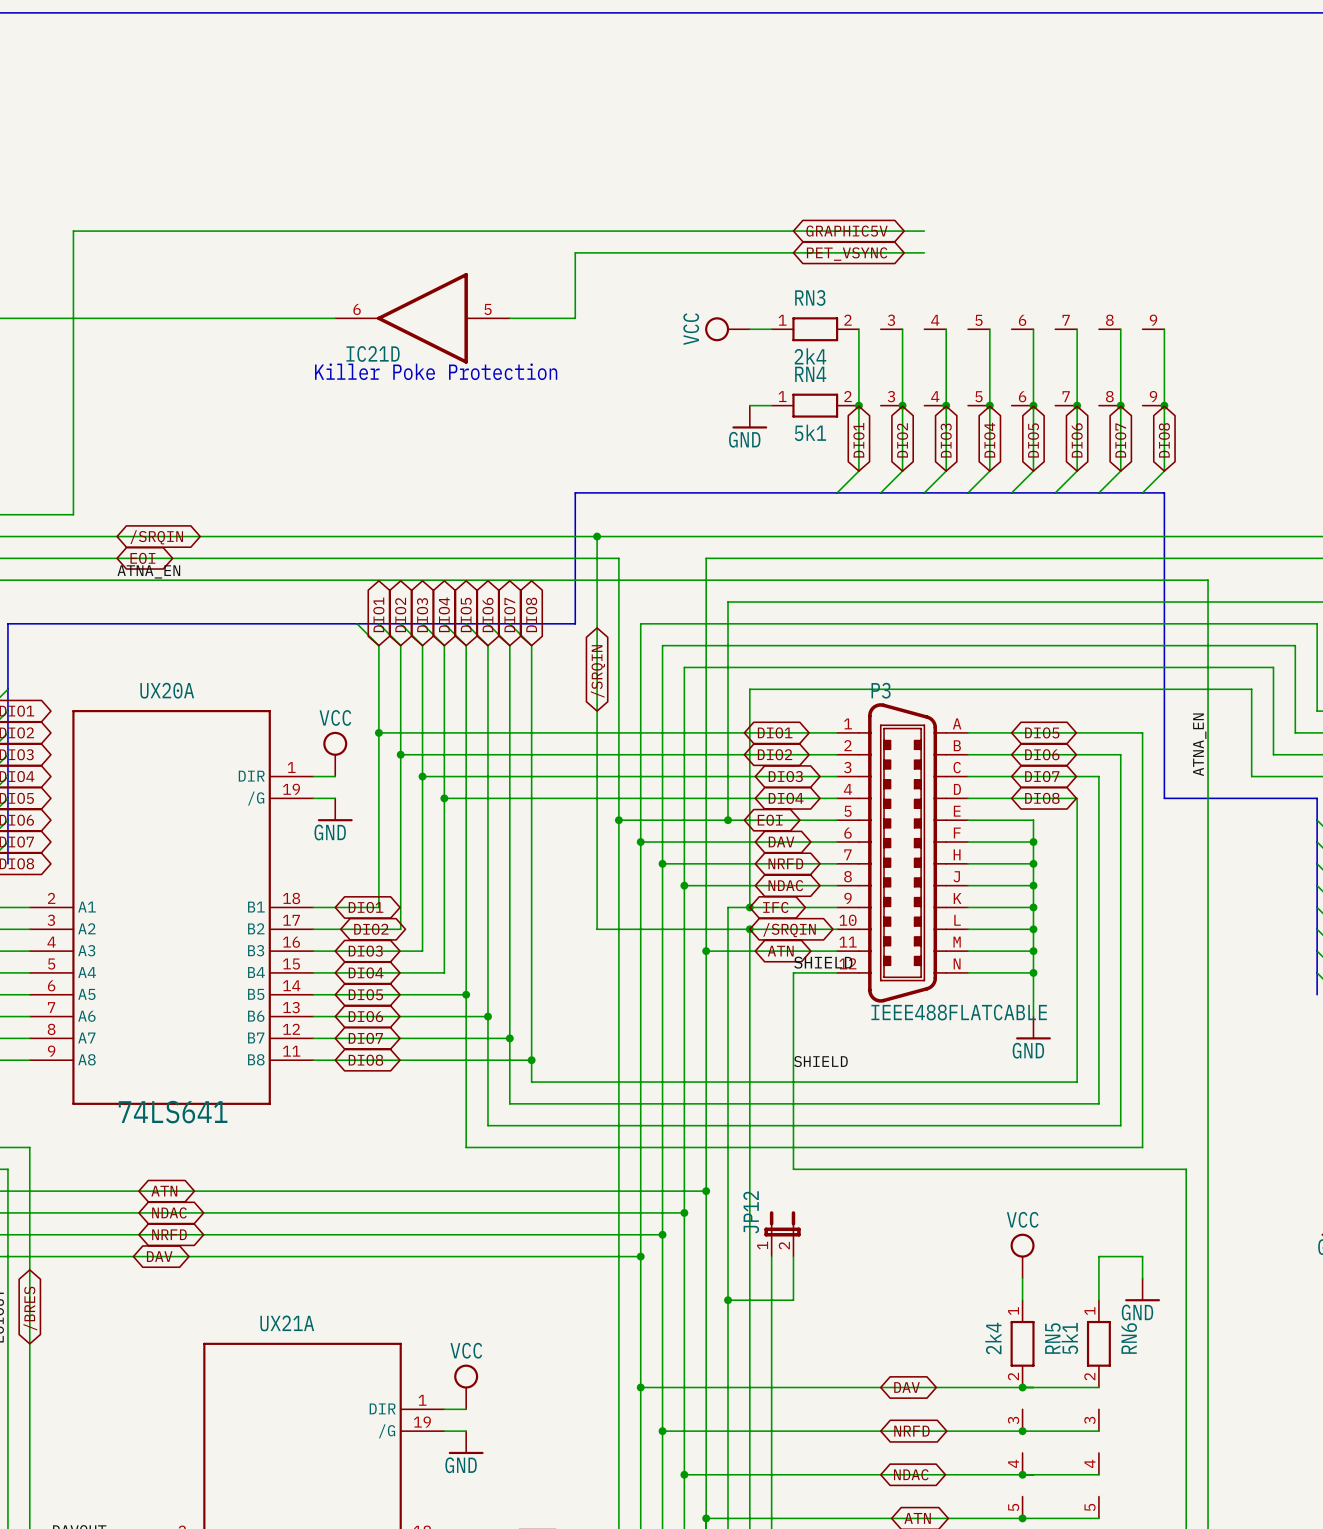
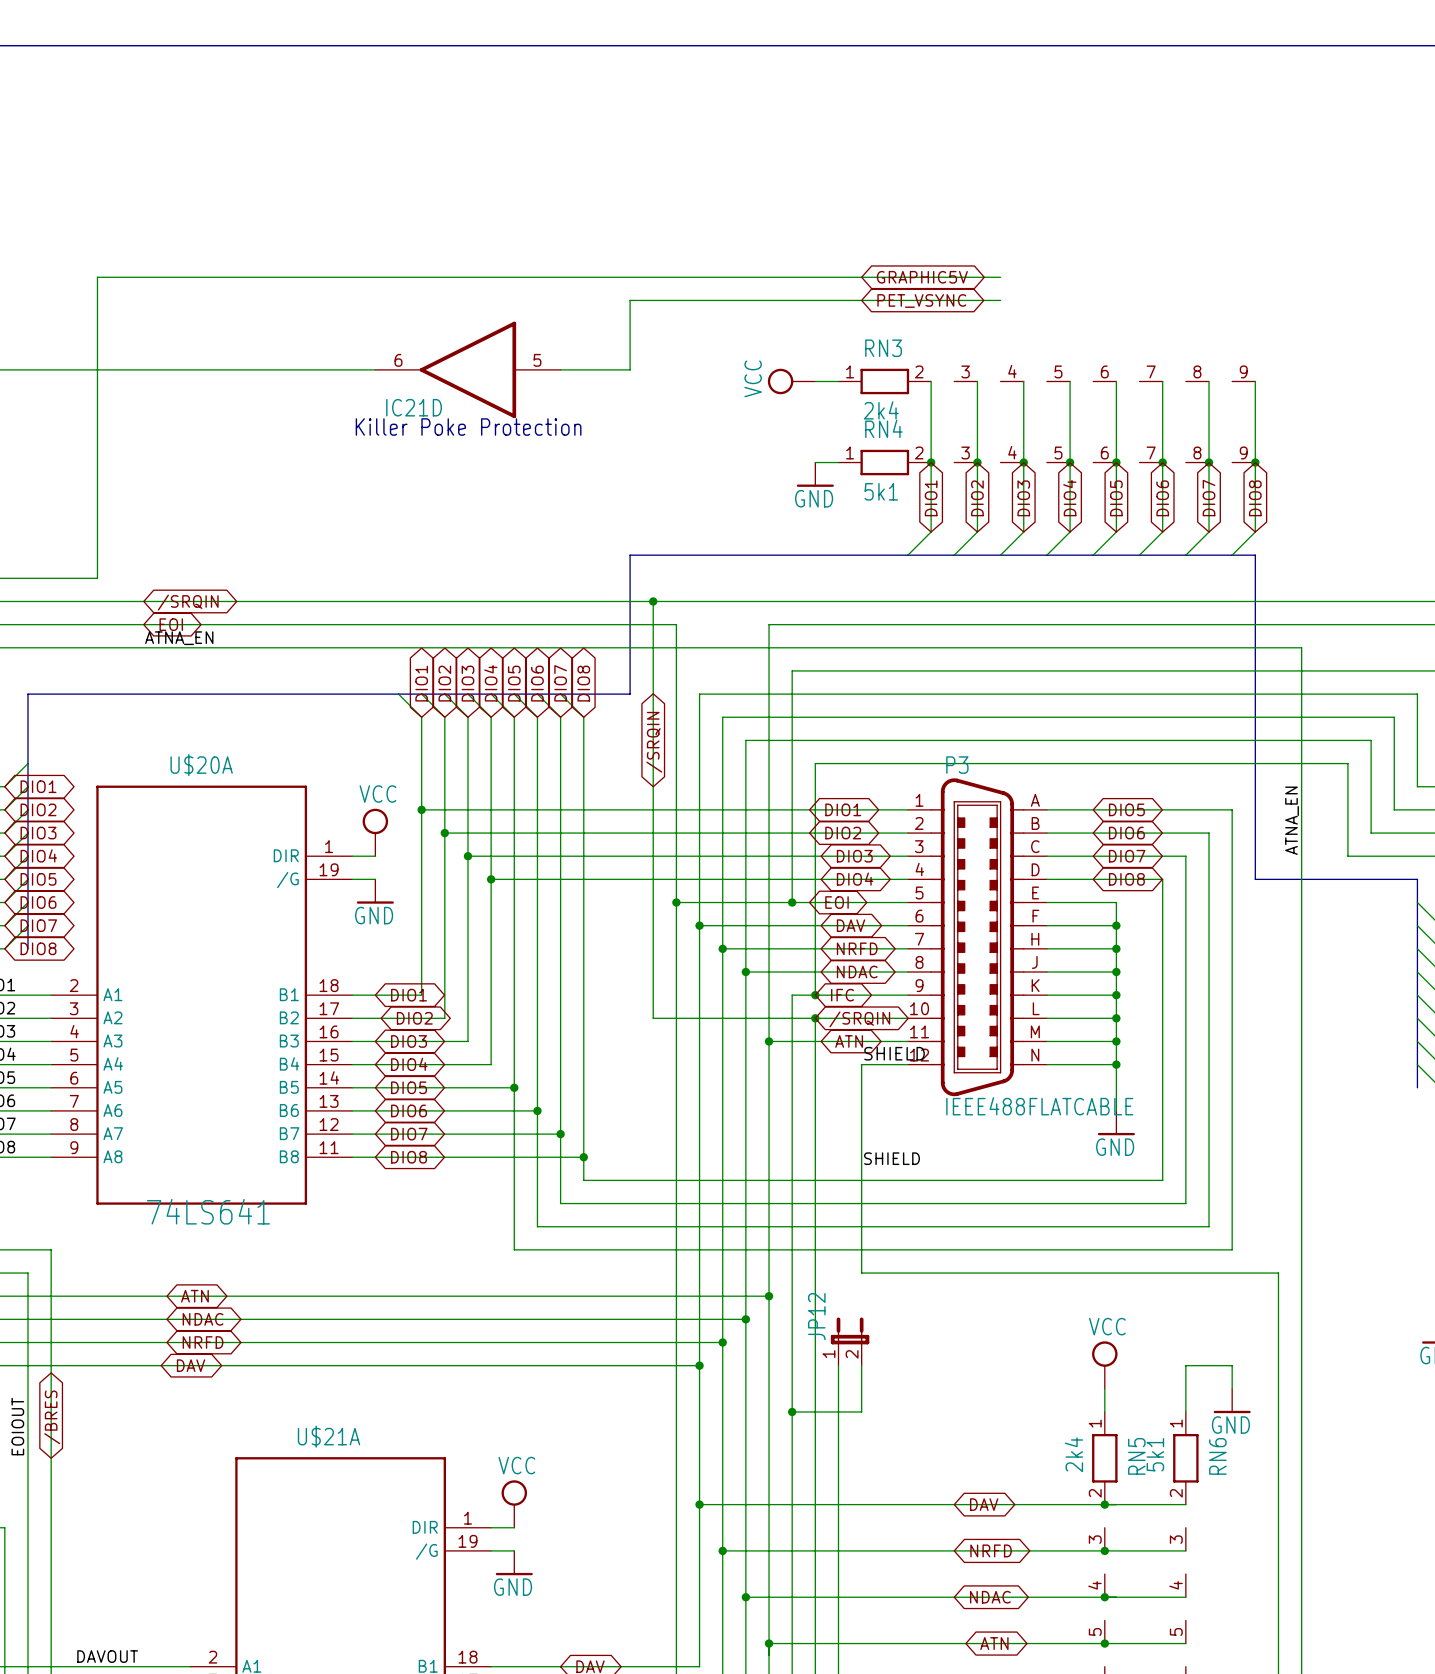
UX20A name: UX20A (167, 690) -> U$20A (201, 765)
UX21A name: UX21A (287, 1323) -> U$21A (329, 1436)

